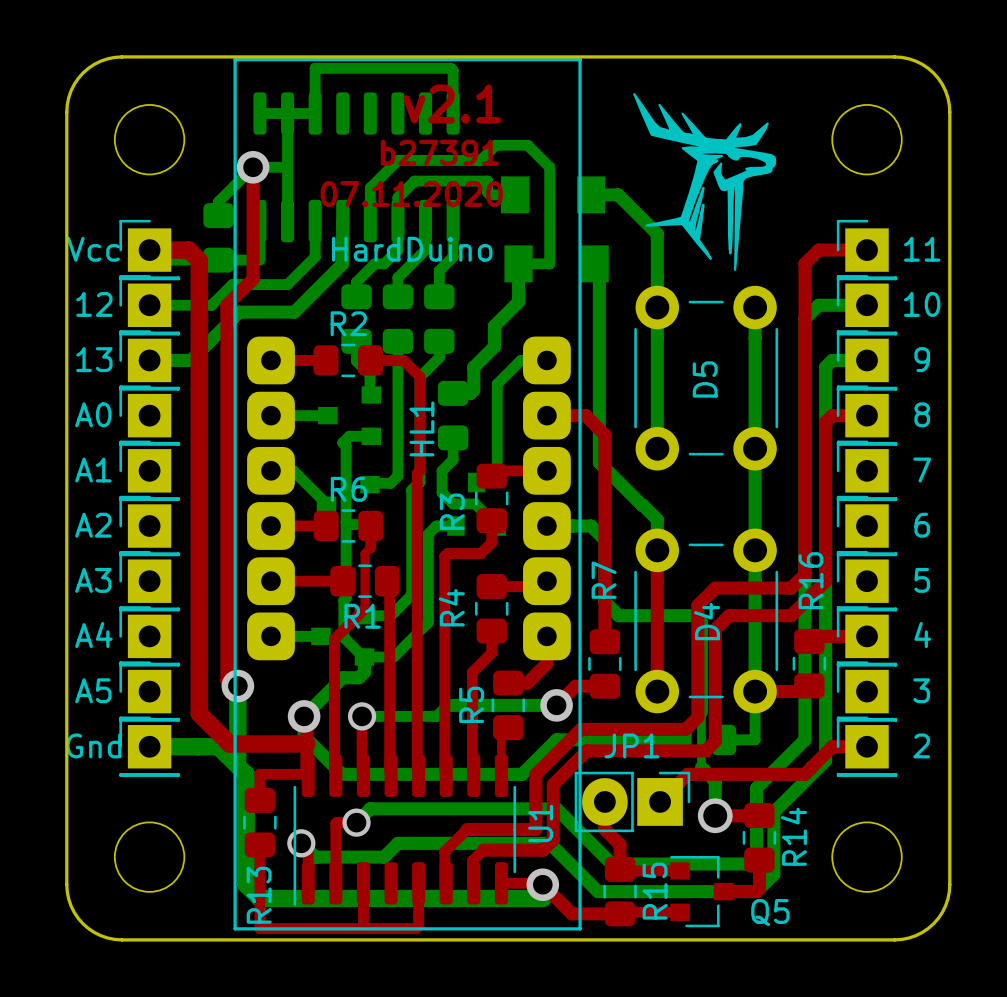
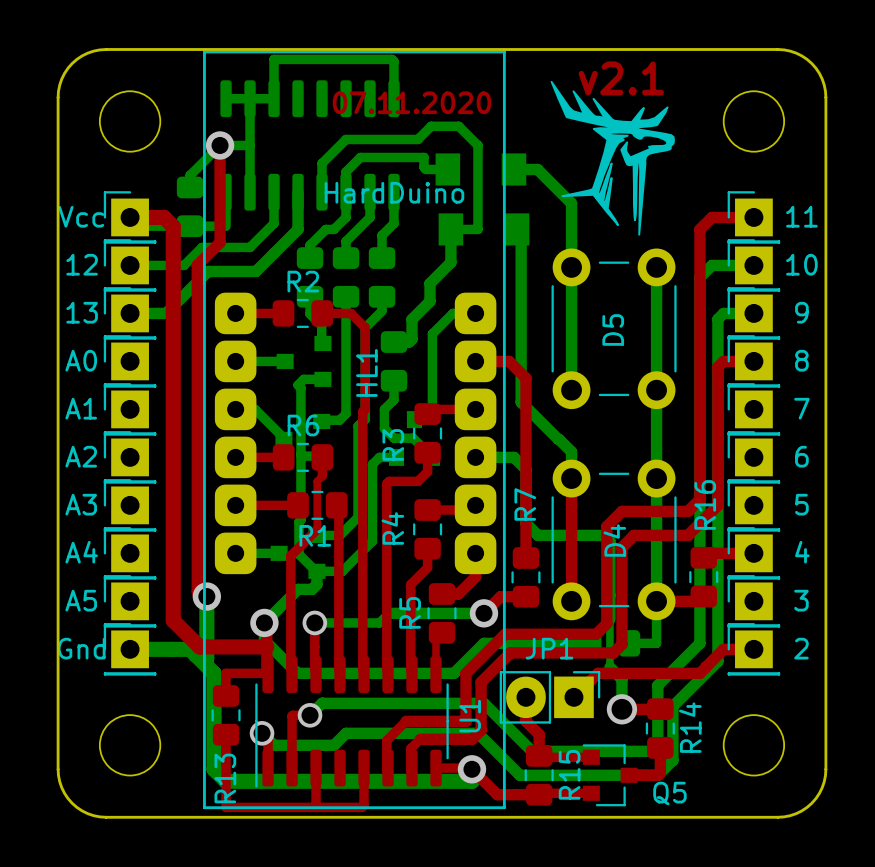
text position: v2.1 (452, 103) -> v2.1 (621, 78)
text: b27391 (439, 152) -> none
text position: 07.11.2020 (411, 194) -> 07.11.2020 (412, 102)
text position: HardDuino (412, 249) -> HardDuino (394, 192)

